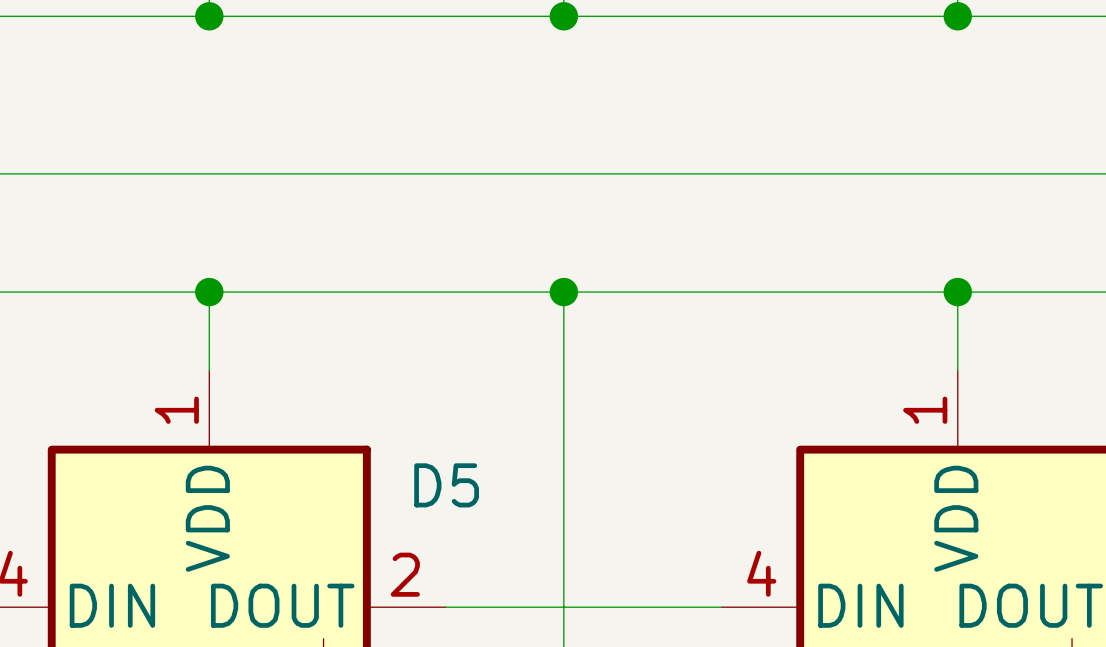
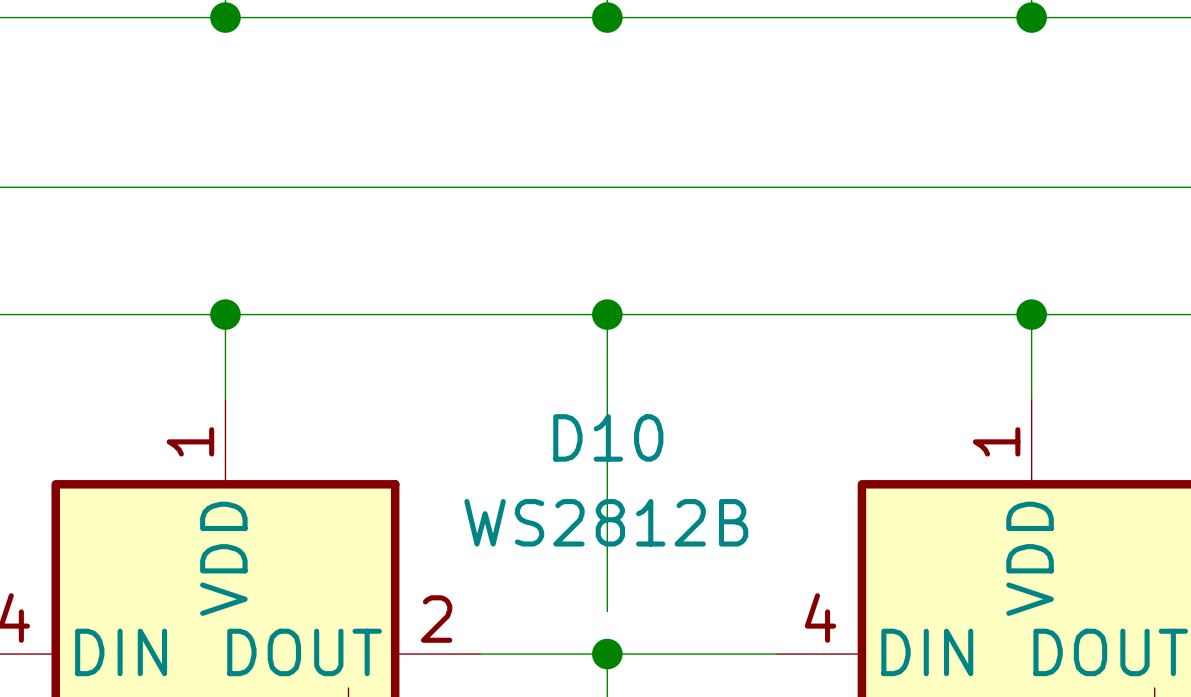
D5 name: D5 (446, 485) -> D10 (608, 437)
D5 value: none -> WS2812B (606, 522)
wire: (563, 567) (563, 607) -> none
junction: none -> (607, 654)

